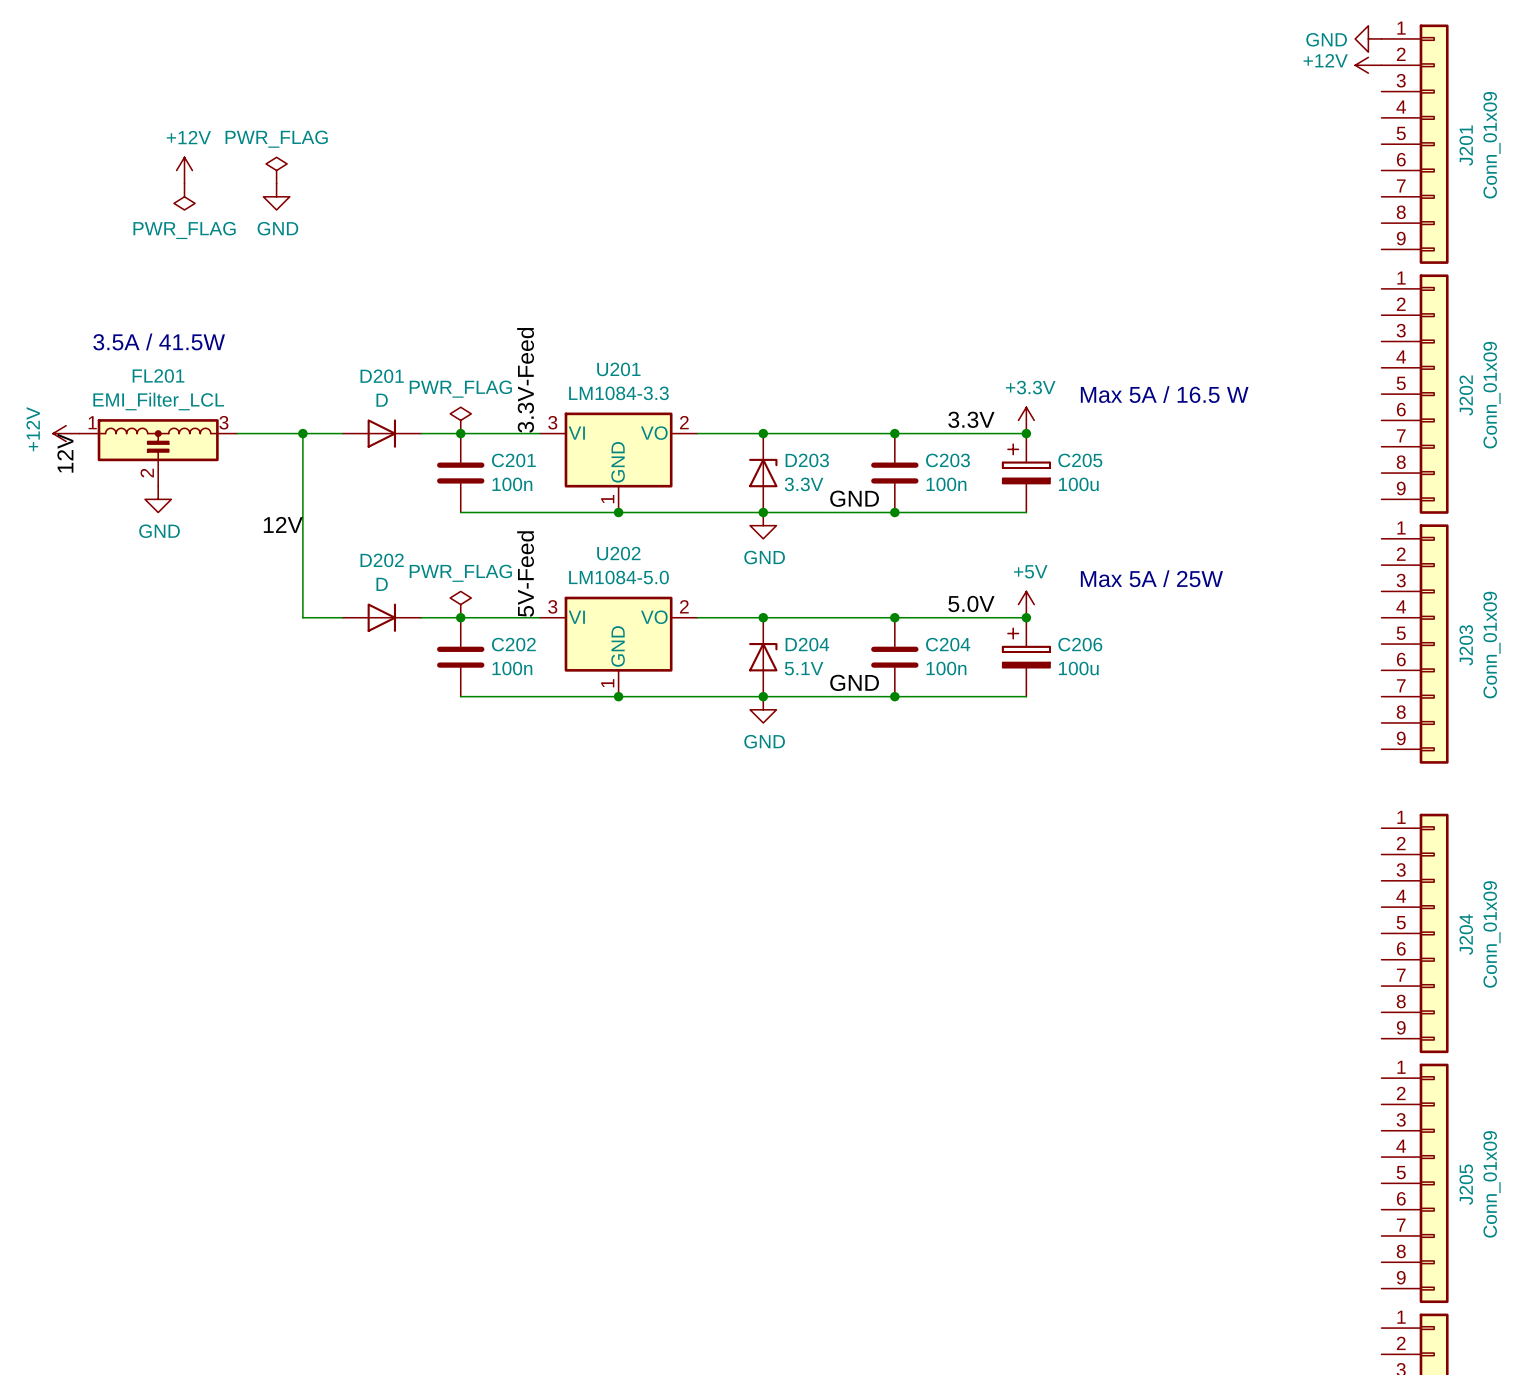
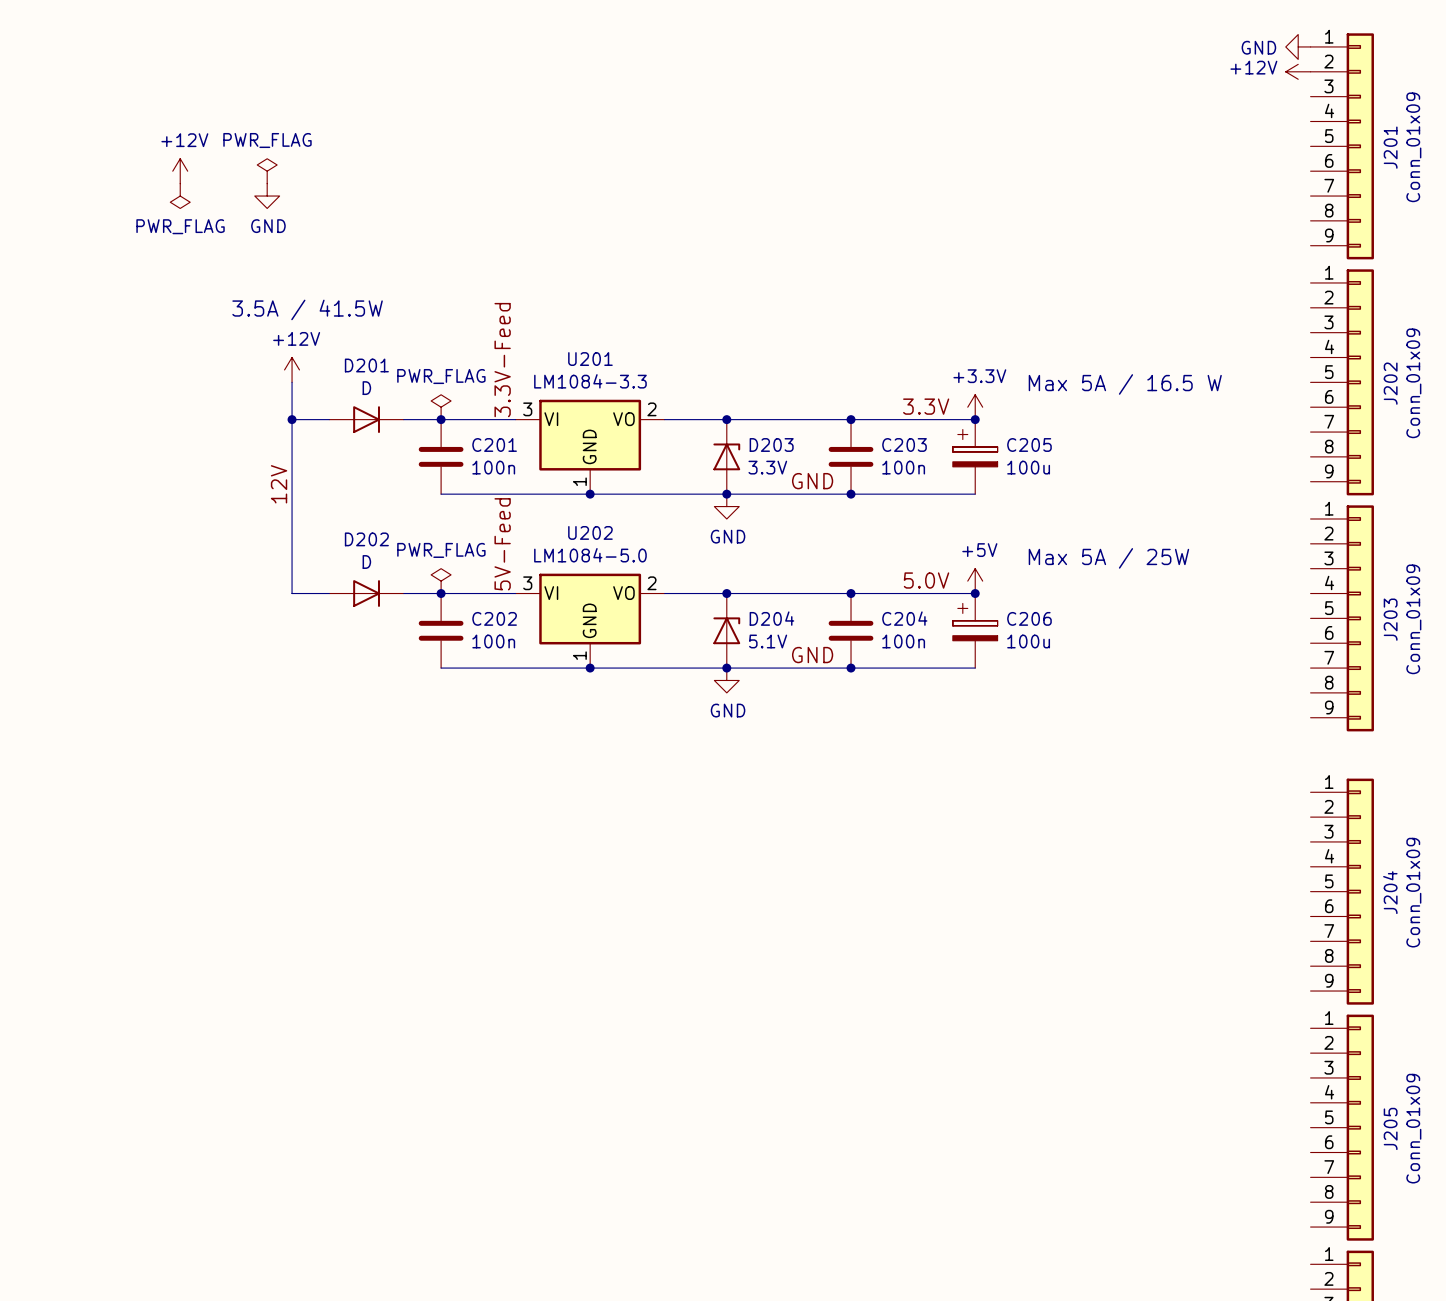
text position: 3.5A / 41.5W (159, 341) -> 3.5A / 41.5W (307, 309)
power symbol rotation: 0° (66, 433) -> 90° clockwise (292, 369)
power symbol position: +12V (66, 433) -> +12V (292, 369)
wire: (237, 433) (302, 433) -> (292, 382) (292, 419)
FL201: EMI_Filter_LCL (158, 452) -> none
label: 12V (65, 453) -> none
power symbol: GND (158, 499) -> none
label rotation: 0° (283, 524) -> 90° counterclockwise (279, 484)

